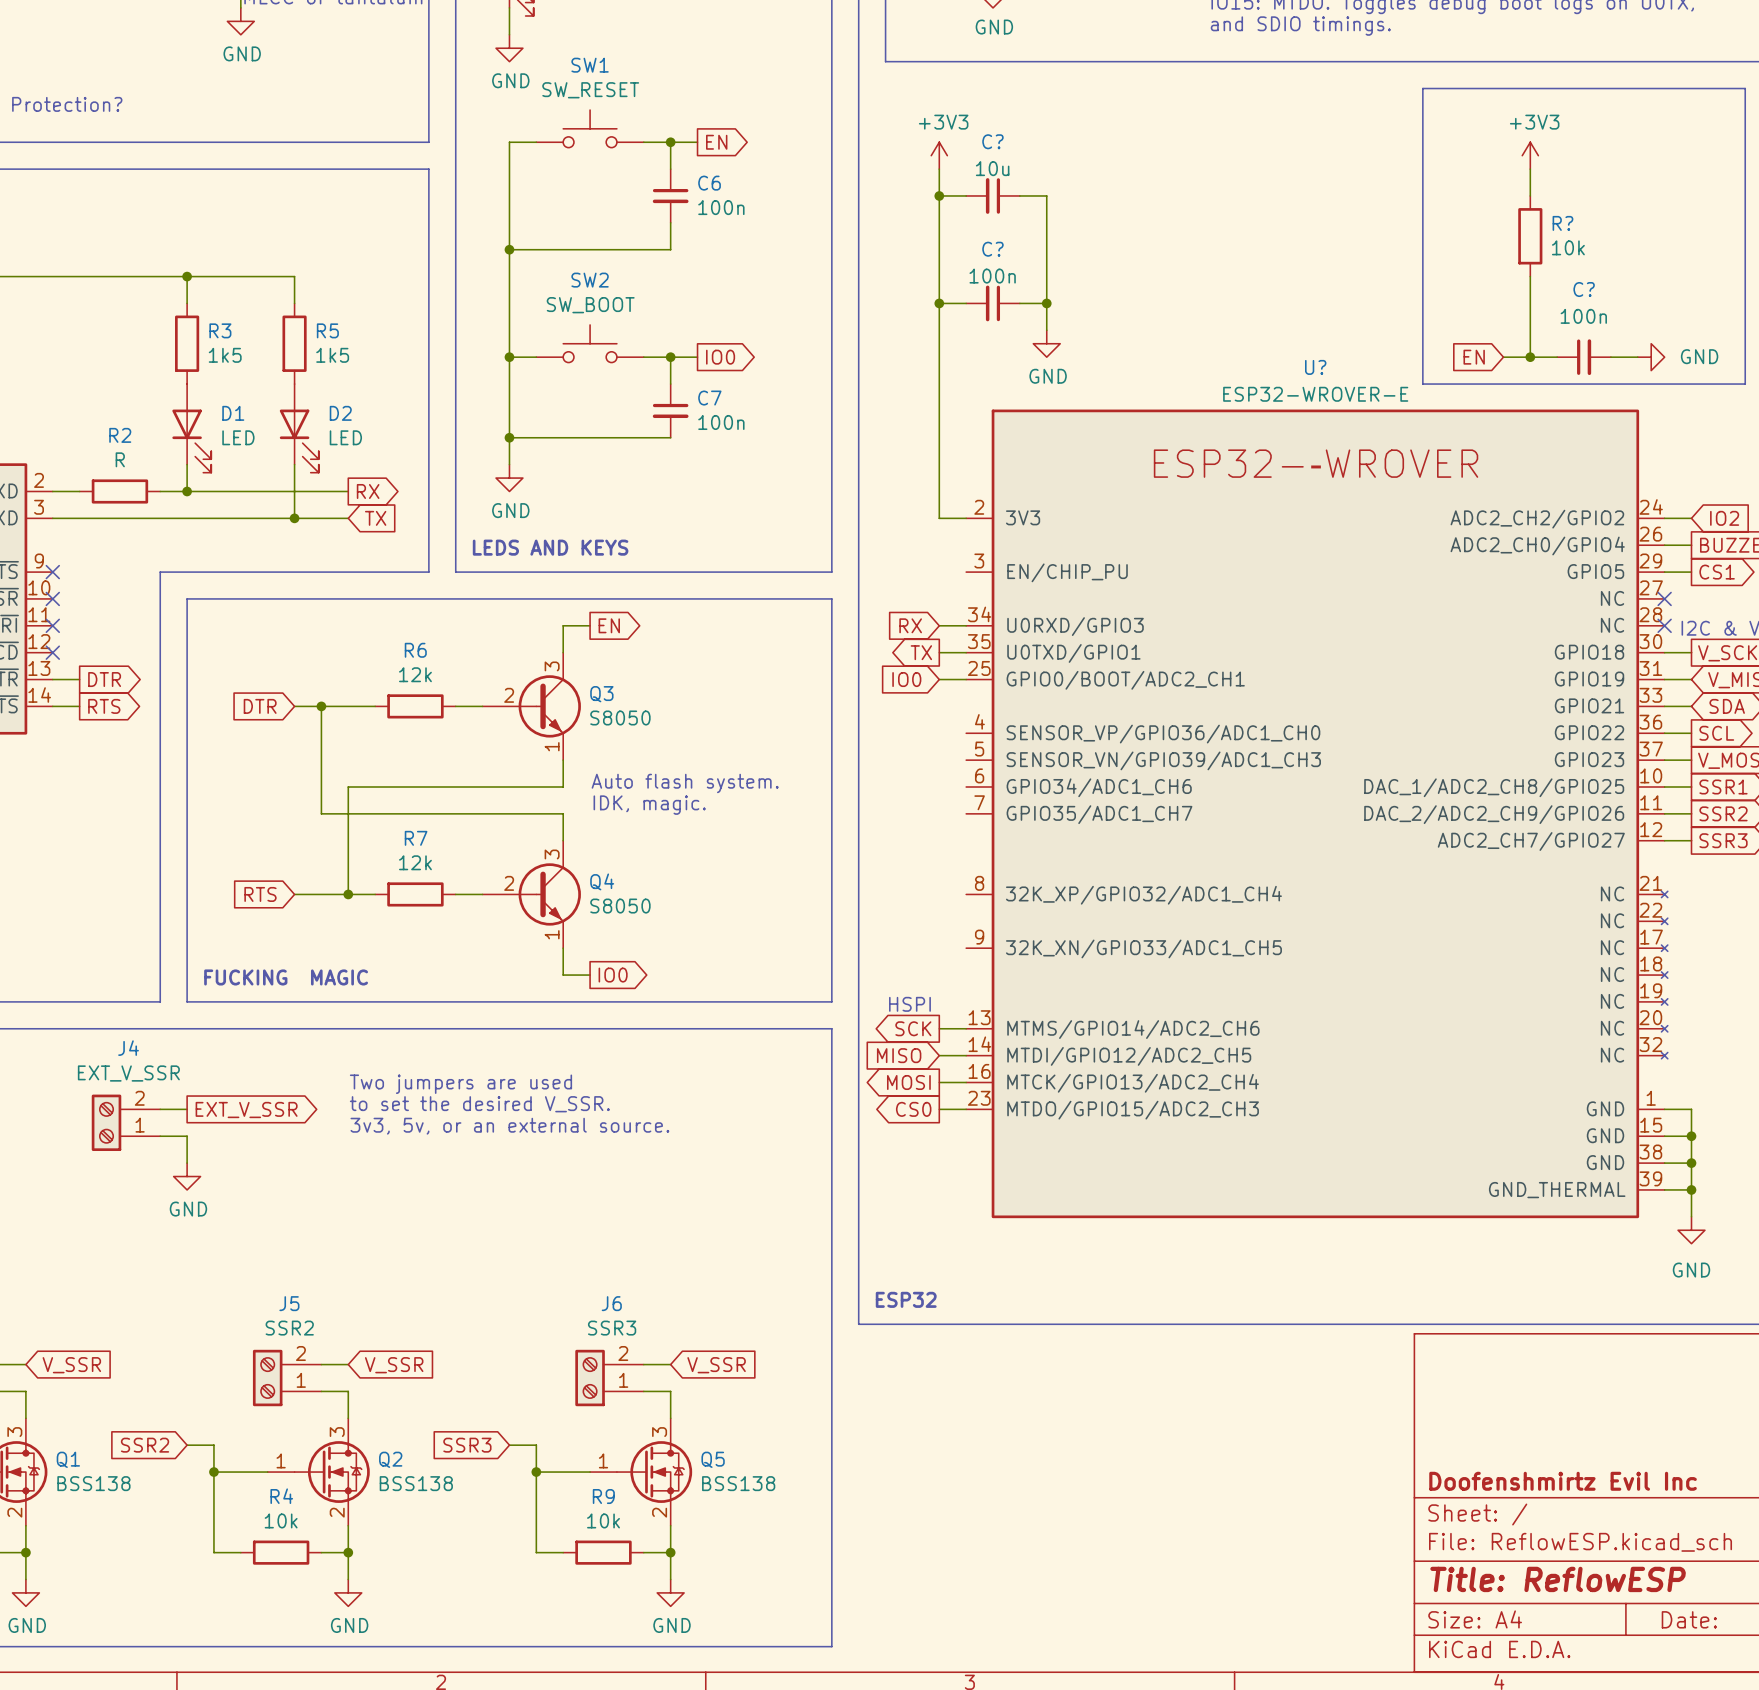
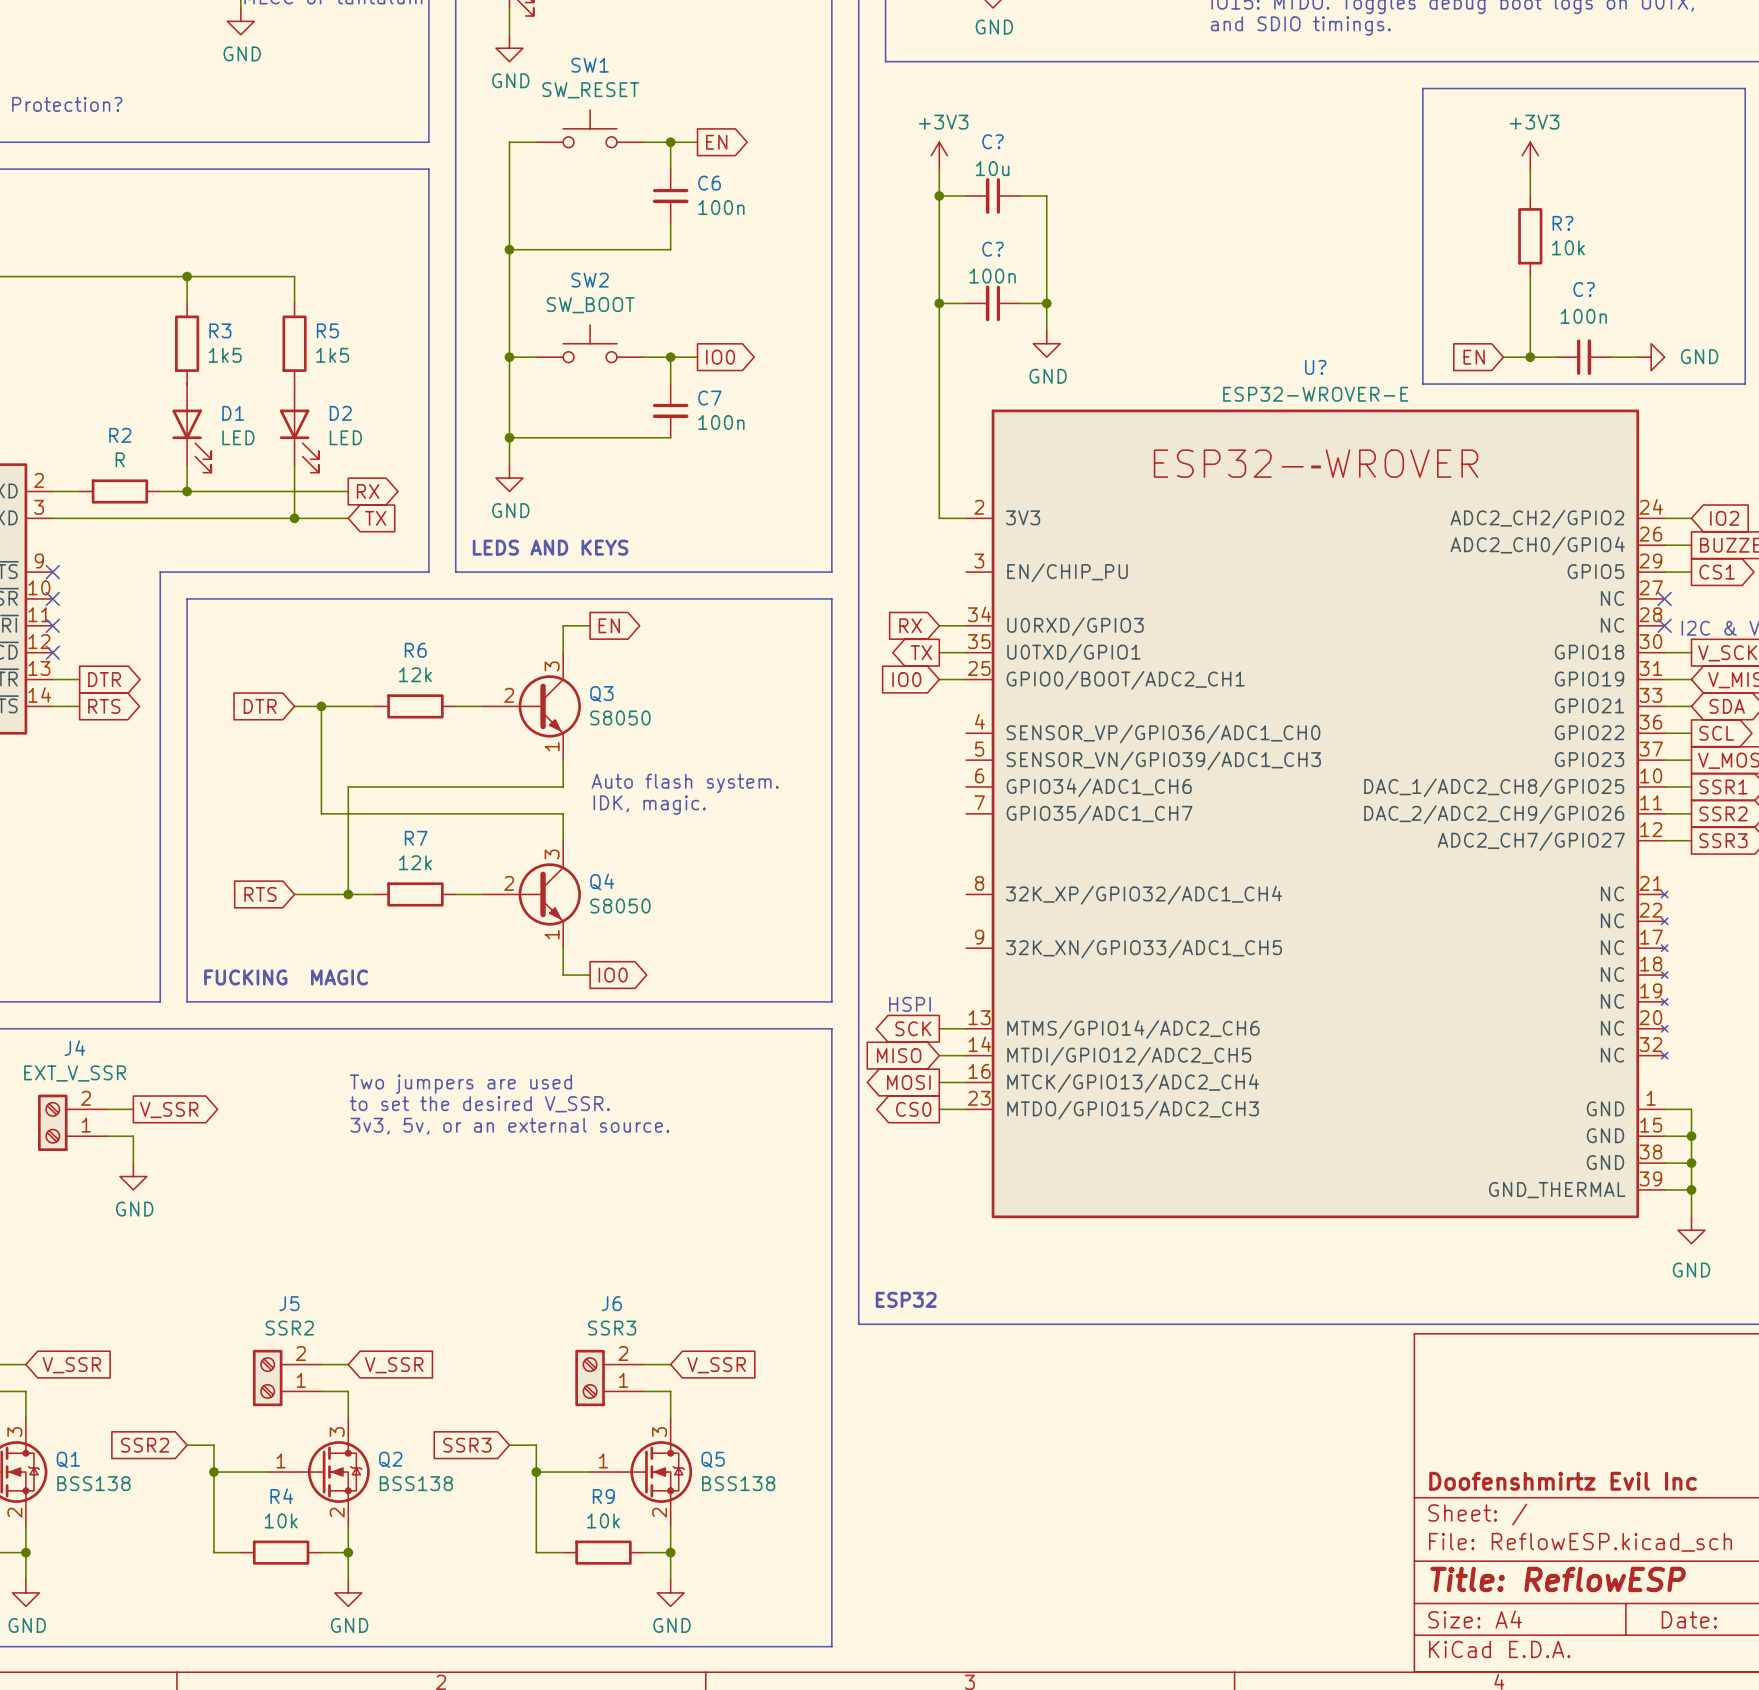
global label: EXT_V_SSR (246, 1110) -> V_SSR (169, 1110)
J4 position: (125, 1122) -> (72, 1122)
wire: (160, 1136) (187, 1136) (187, 1163) -> (106, 1136) (133, 1136) (133, 1163)
power symbol position: GND (187, 1176) -> GND (133, 1176)

